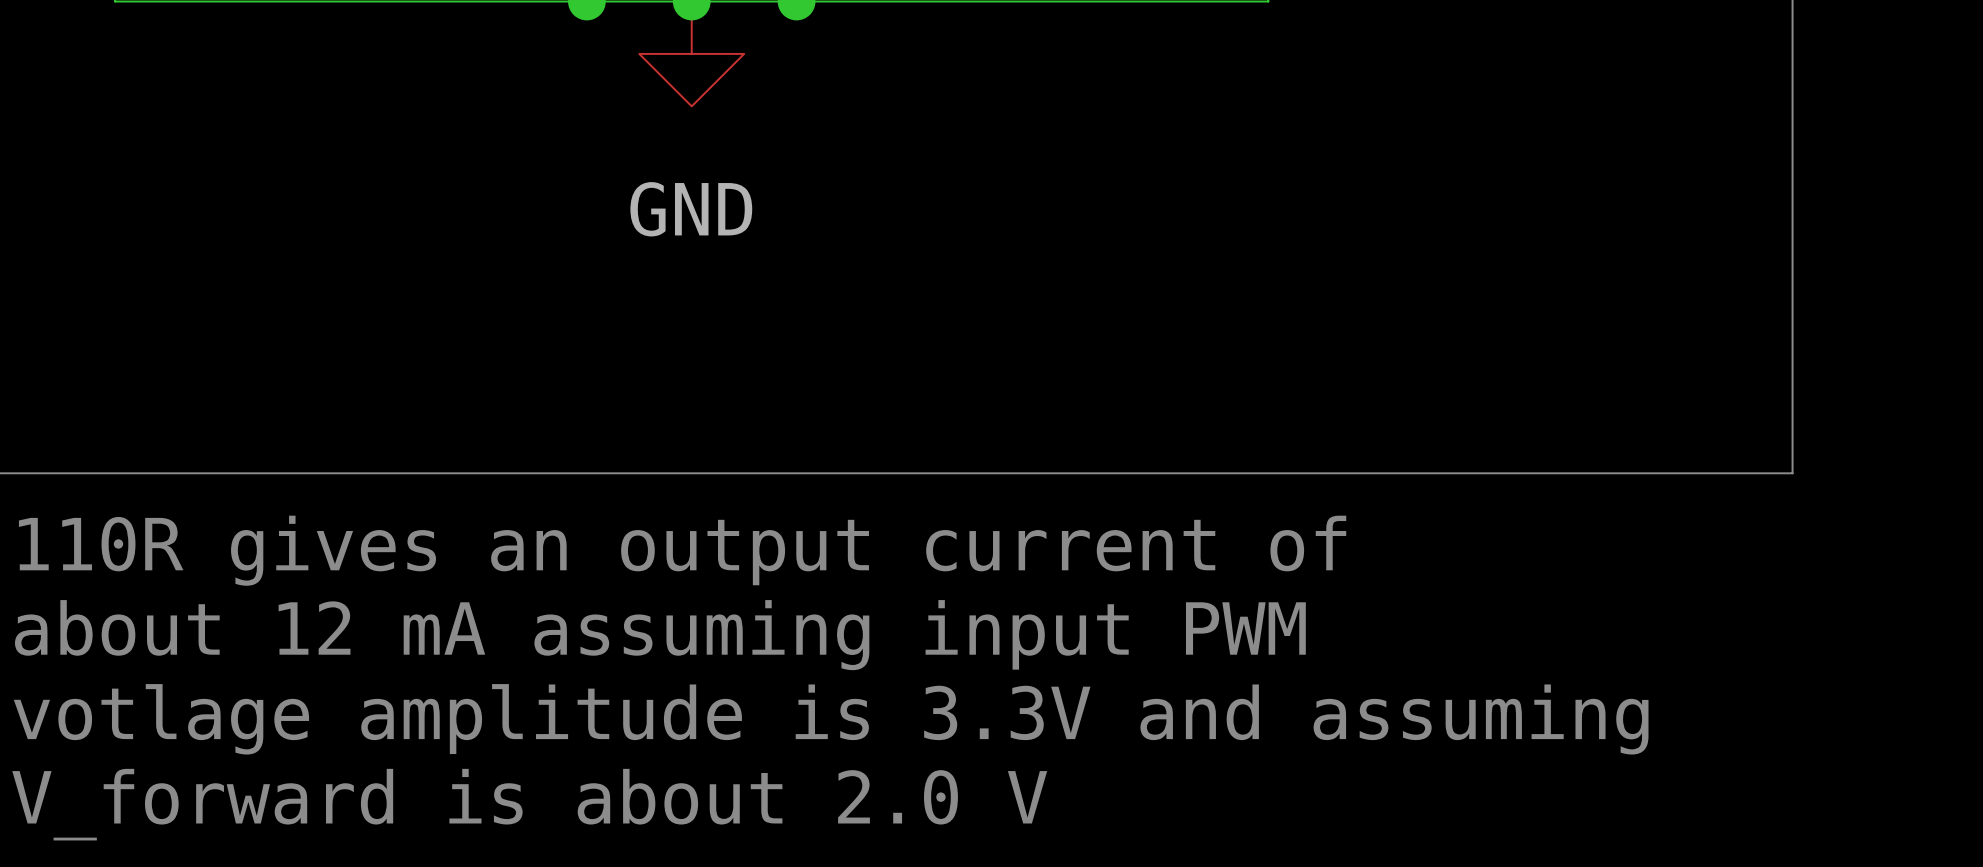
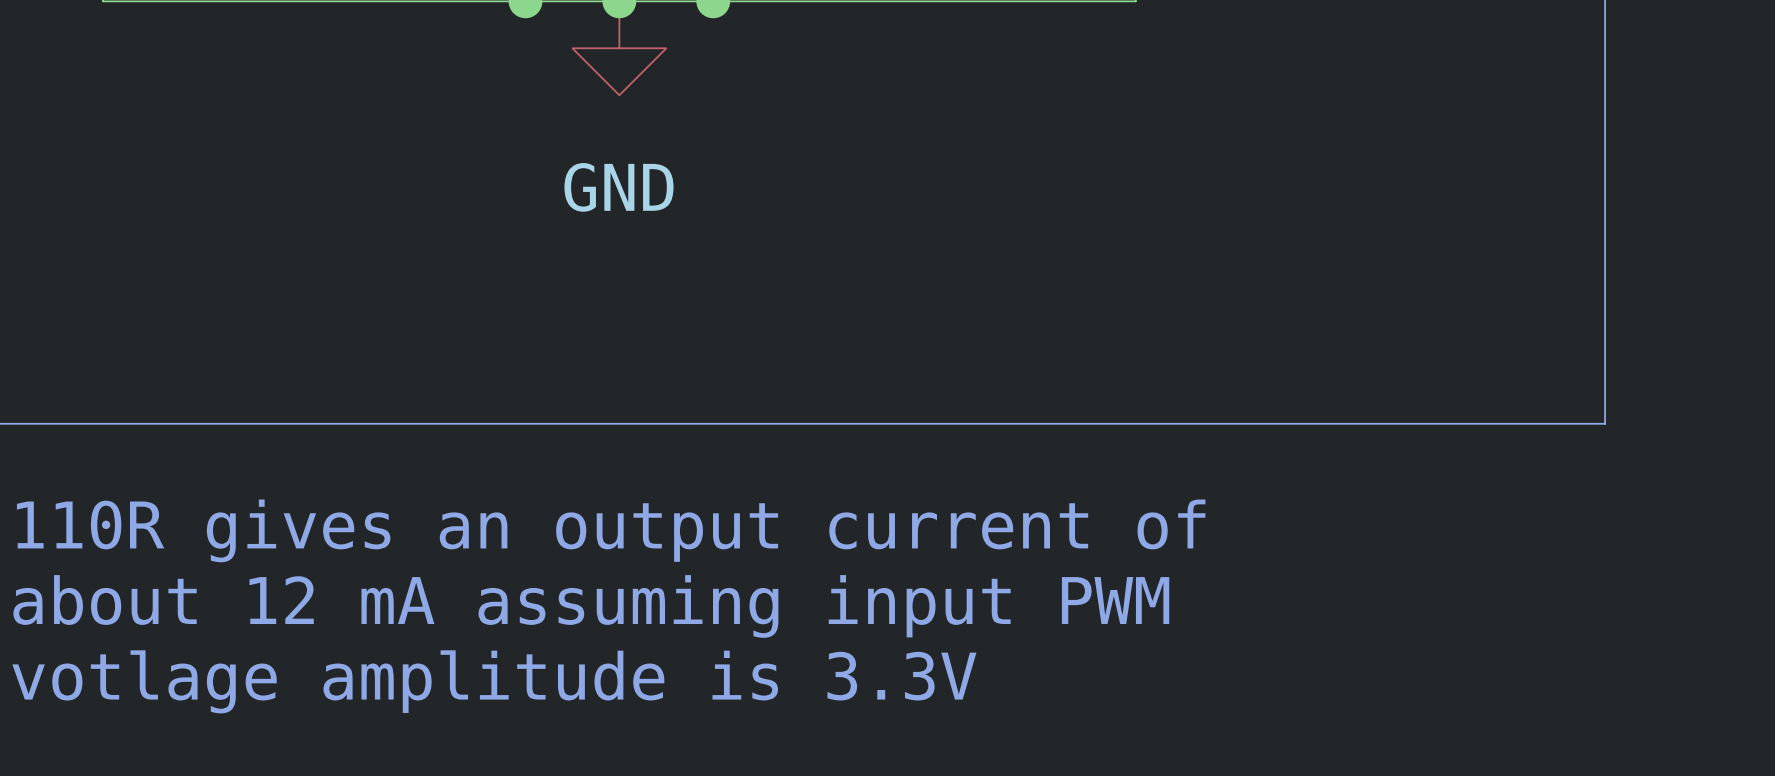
text position: 110R gives an output current of (682, 550) -> 110R gives an output current of (611, 530)
text position: about 12 mA assuming input PWM (660, 635) -> about 12 mA assuming input PWM (591, 606)
text: votlage amplitude is 3.3V and assuming (831, 719) -> votlage amplitude is 3.3V (494, 681)
text: V_forward is about 2.0 V (529, 804) -> none

